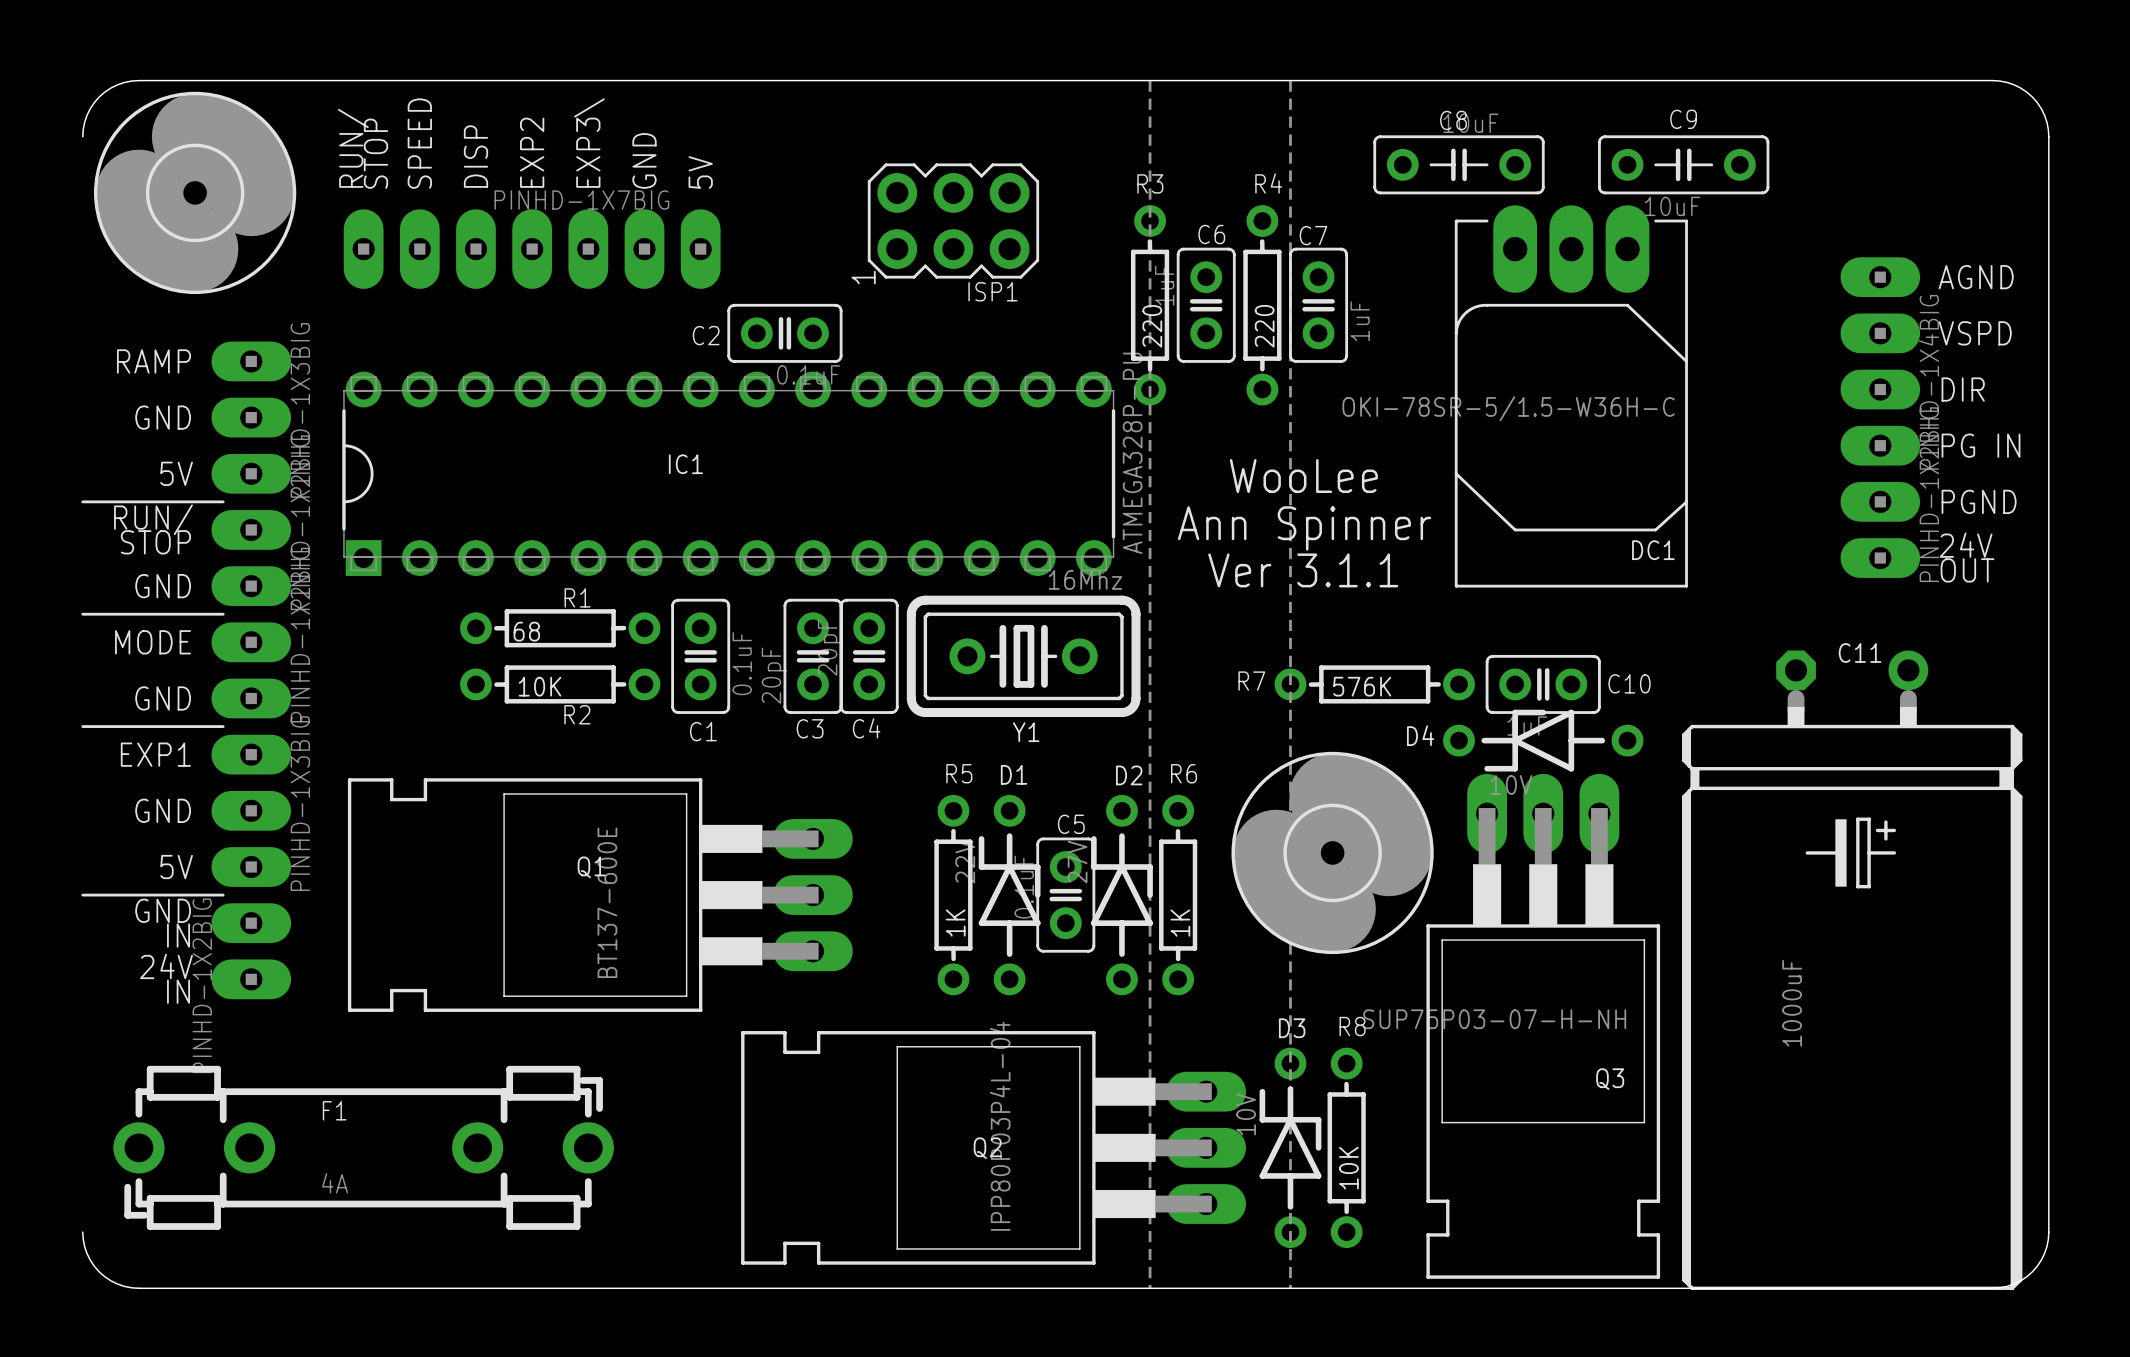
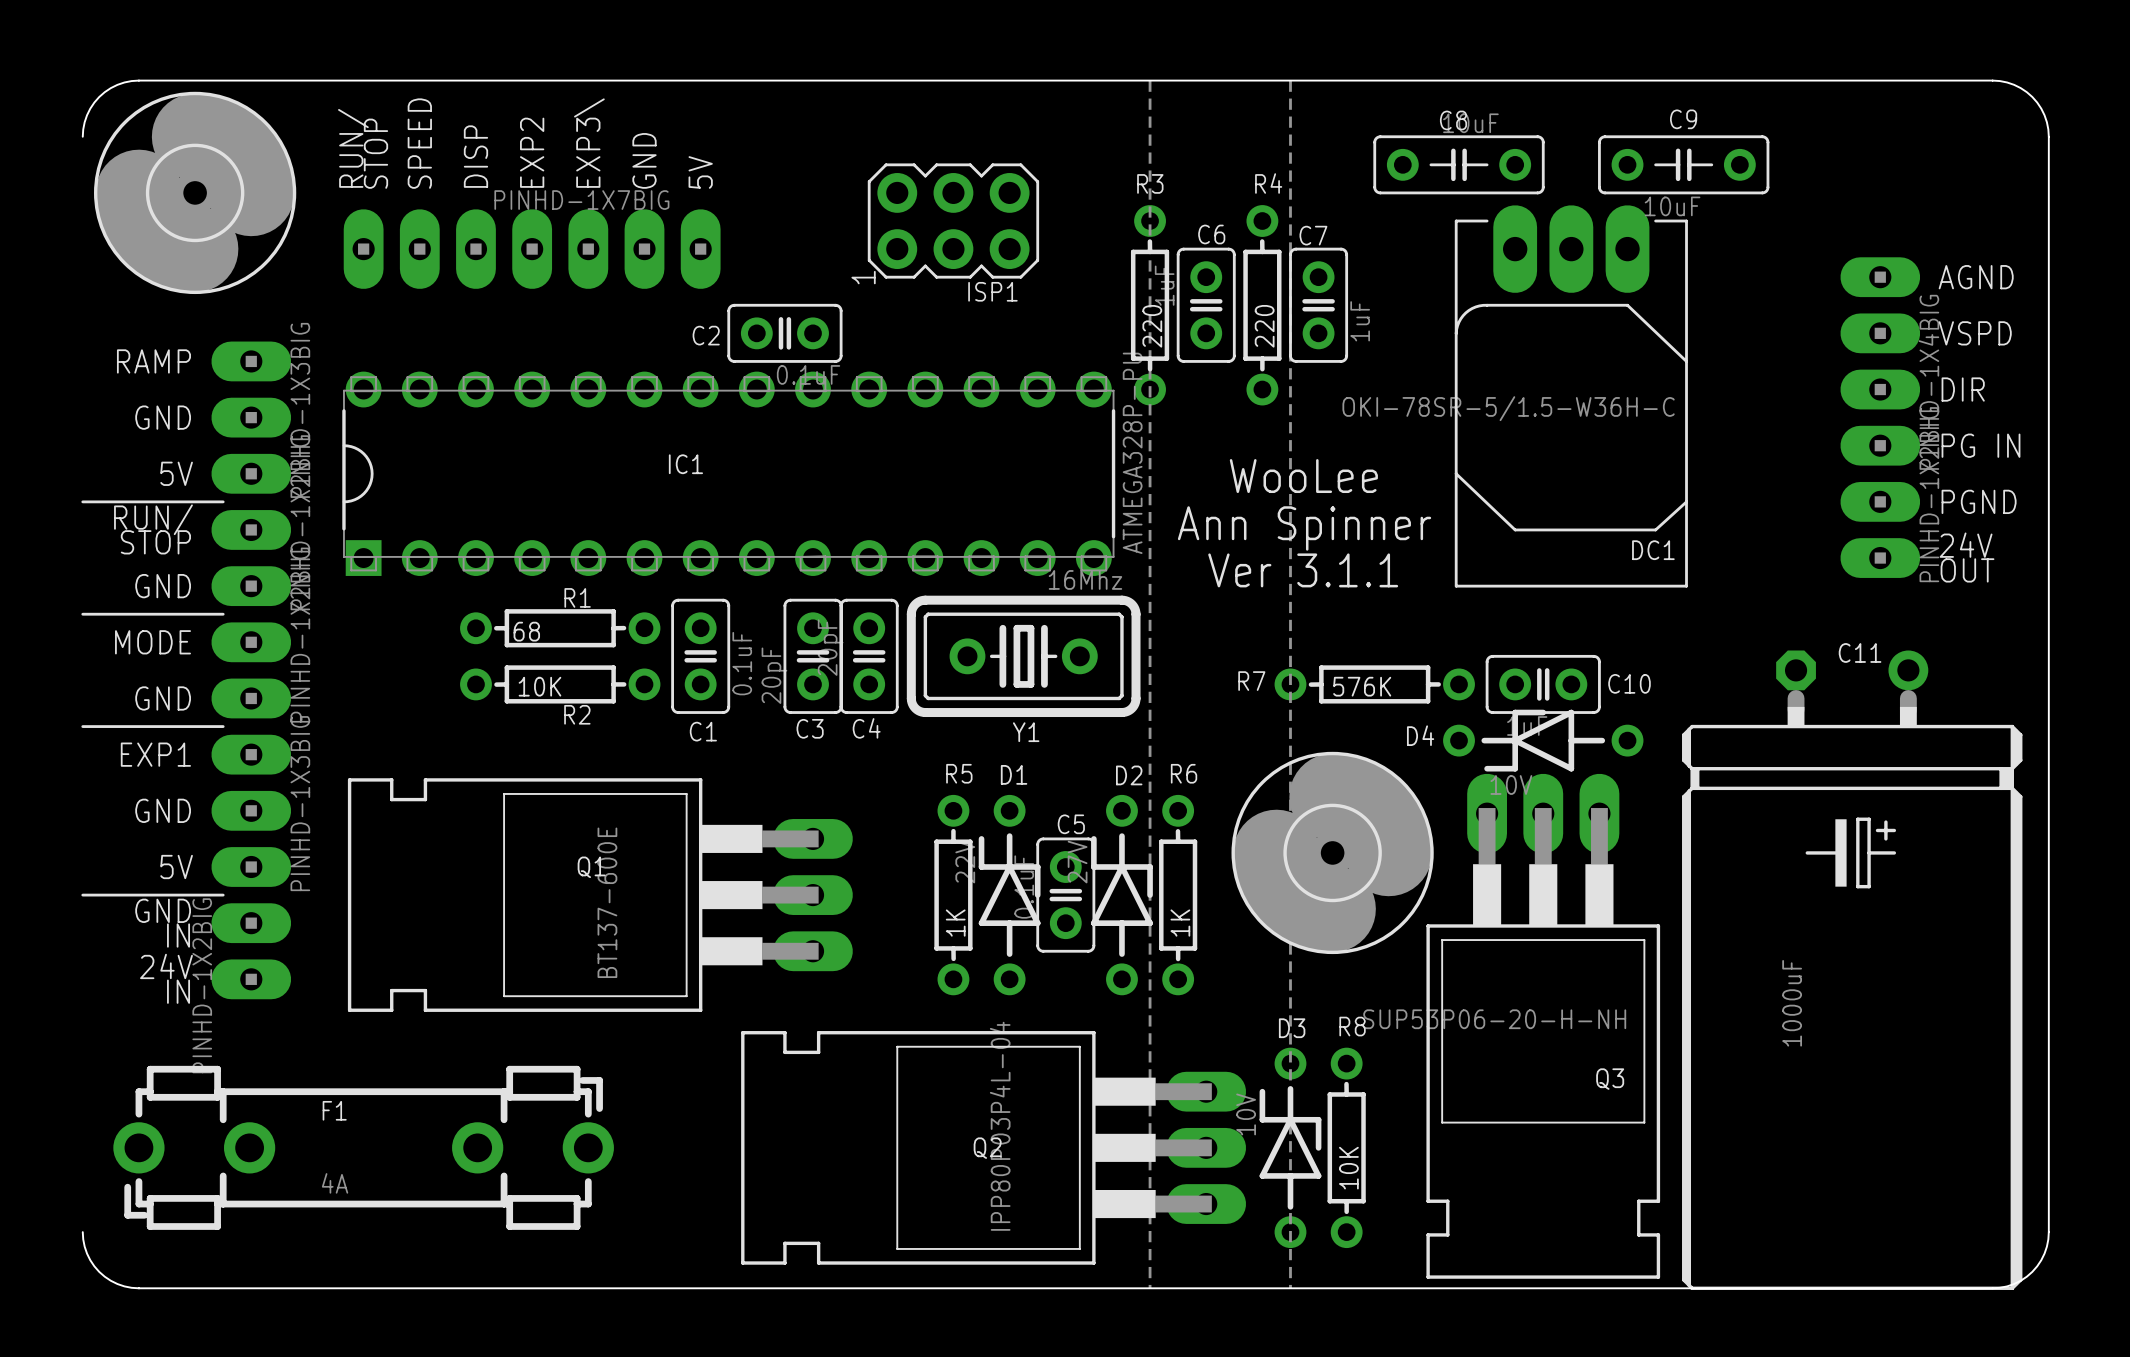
Q3 value: SUP75P03-07-H-NH (1494, 1019) -> SUP53P06-20-H-NH (1494, 1019)

